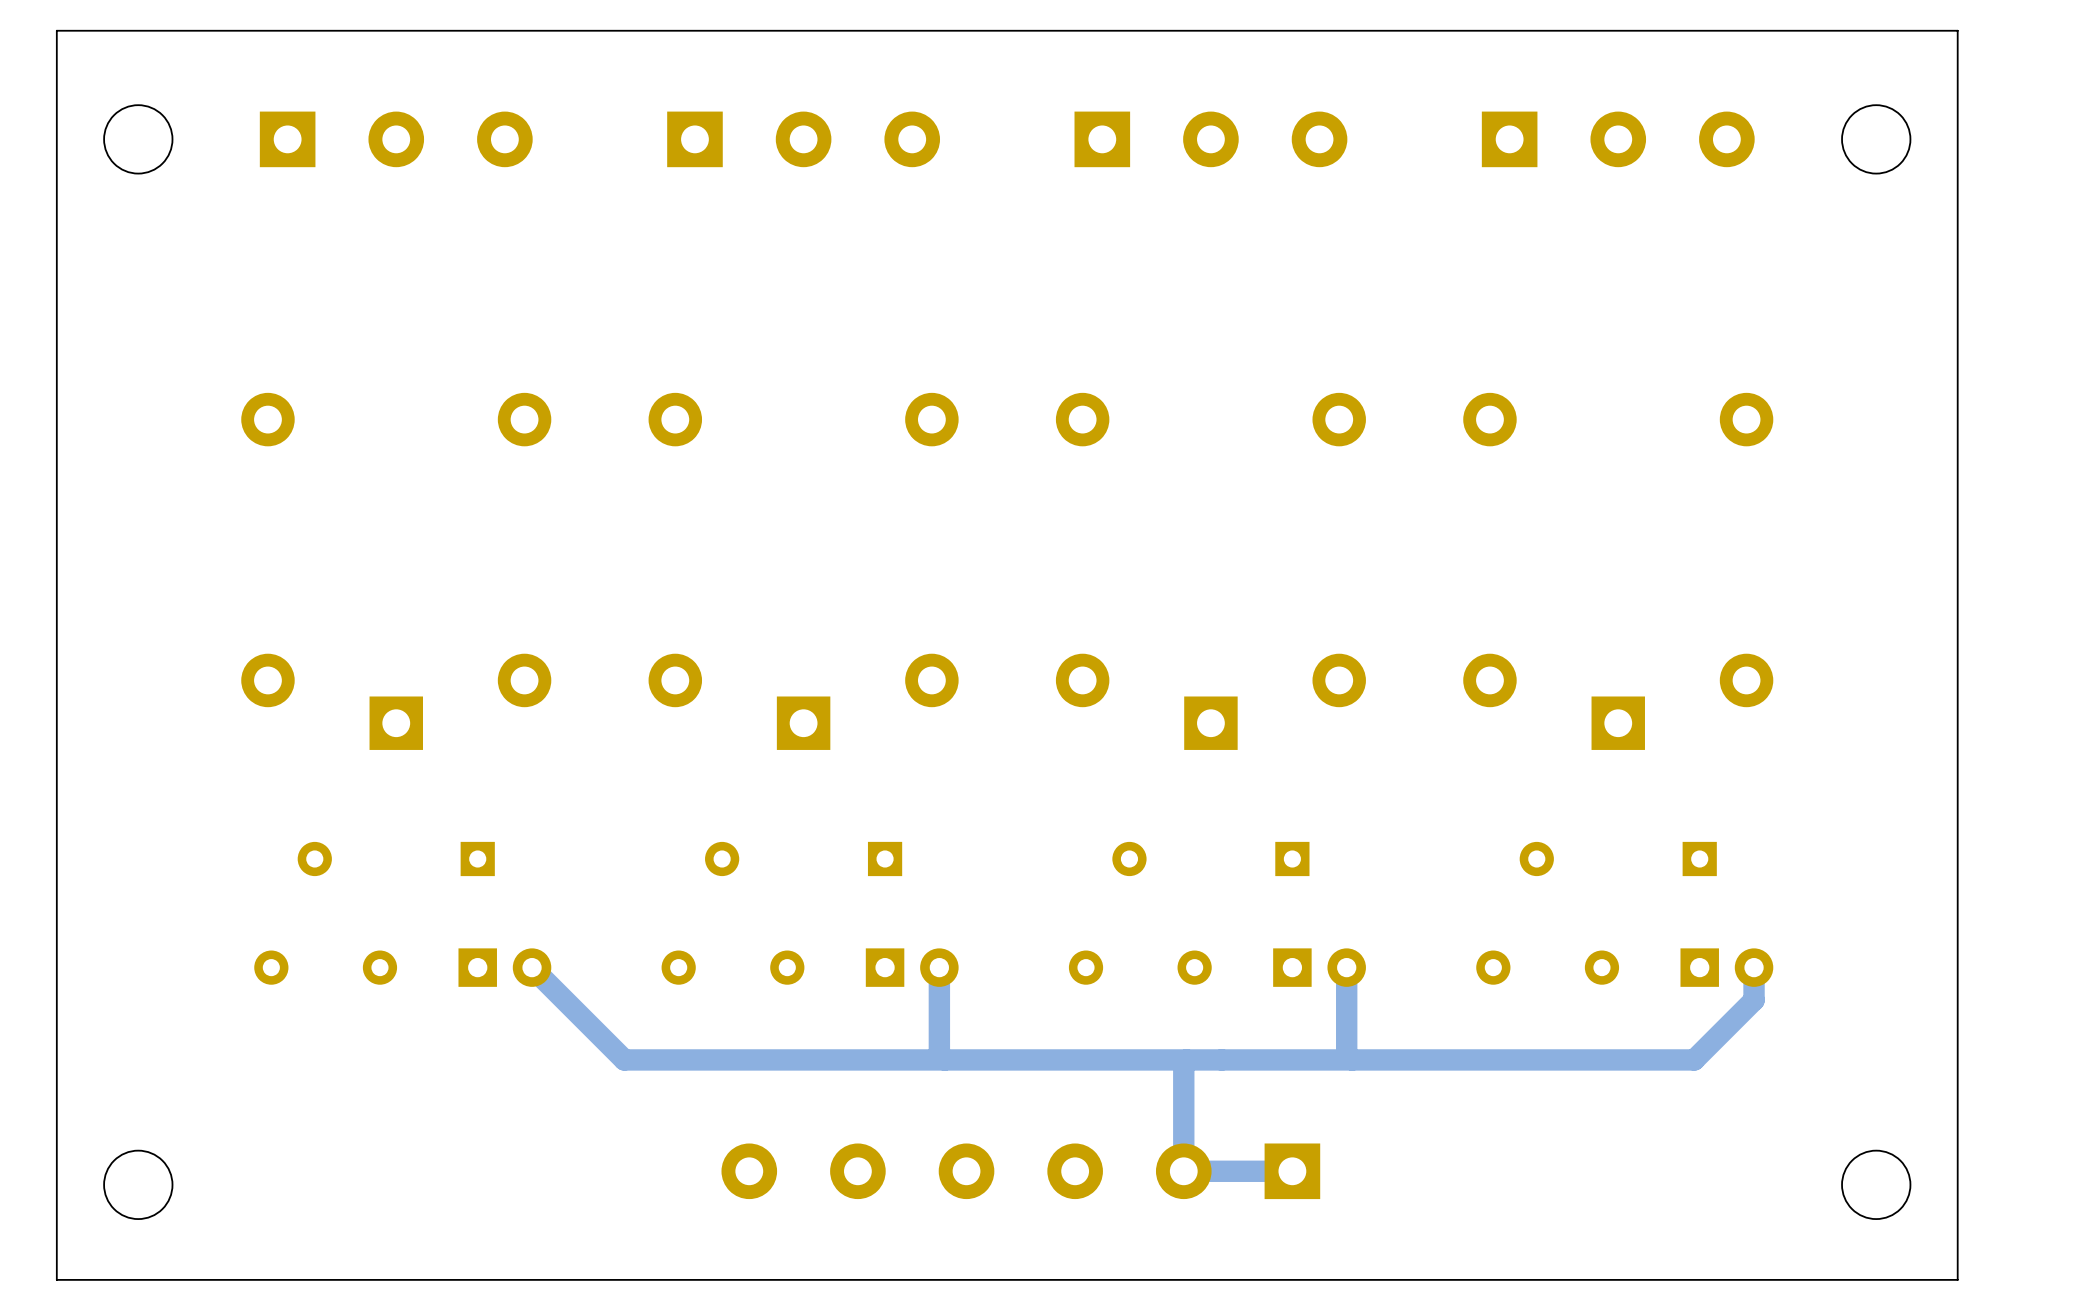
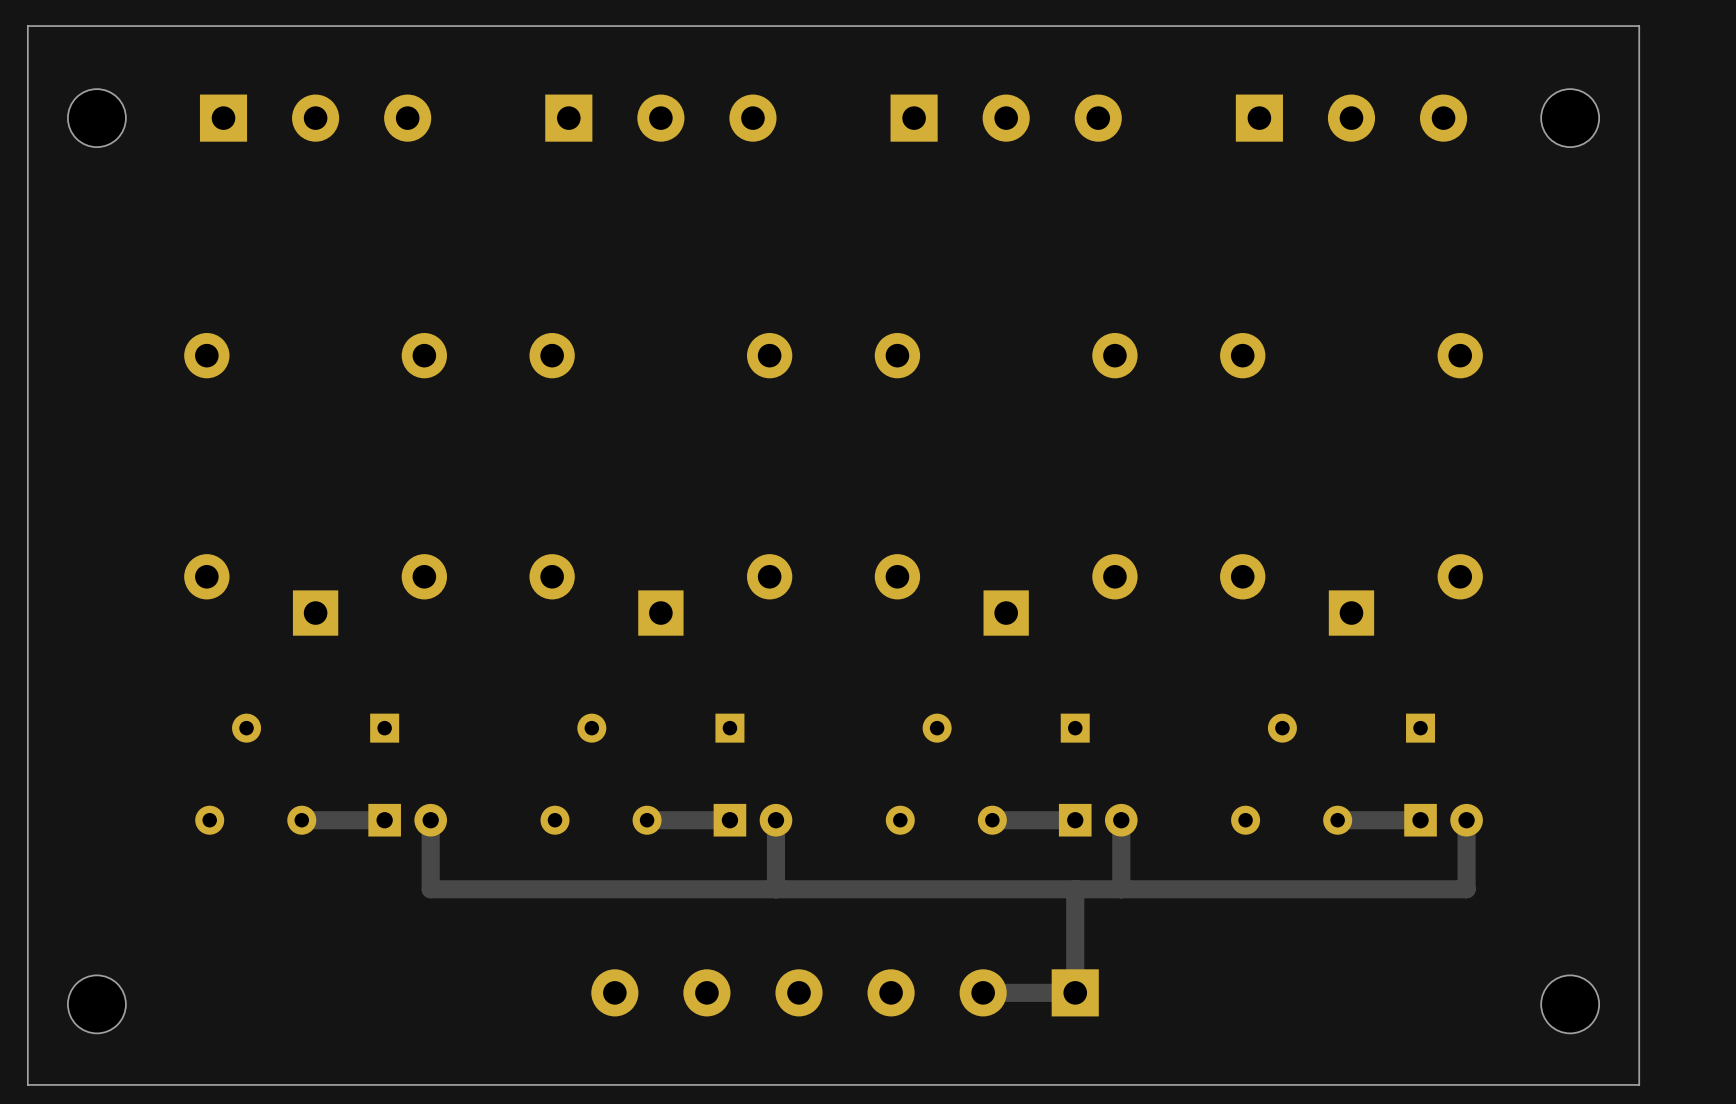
track: none -> (384, 820) (301, 820)
track: (532, 967) (624, 1059) (1694, 1059) (1754, 1000) -> (430, 820) (430, 889) (1466, 889) (1466, 847)
track: none -> (729, 820) (647, 820)
track: none -> (1075, 820) (992, 820)
track: none -> (1420, 820) (1337, 820)
track: none -> (1075, 889) (1075, 992)
track: (1186, 1059) (1183, 1062) (1183, 1171) -> none

